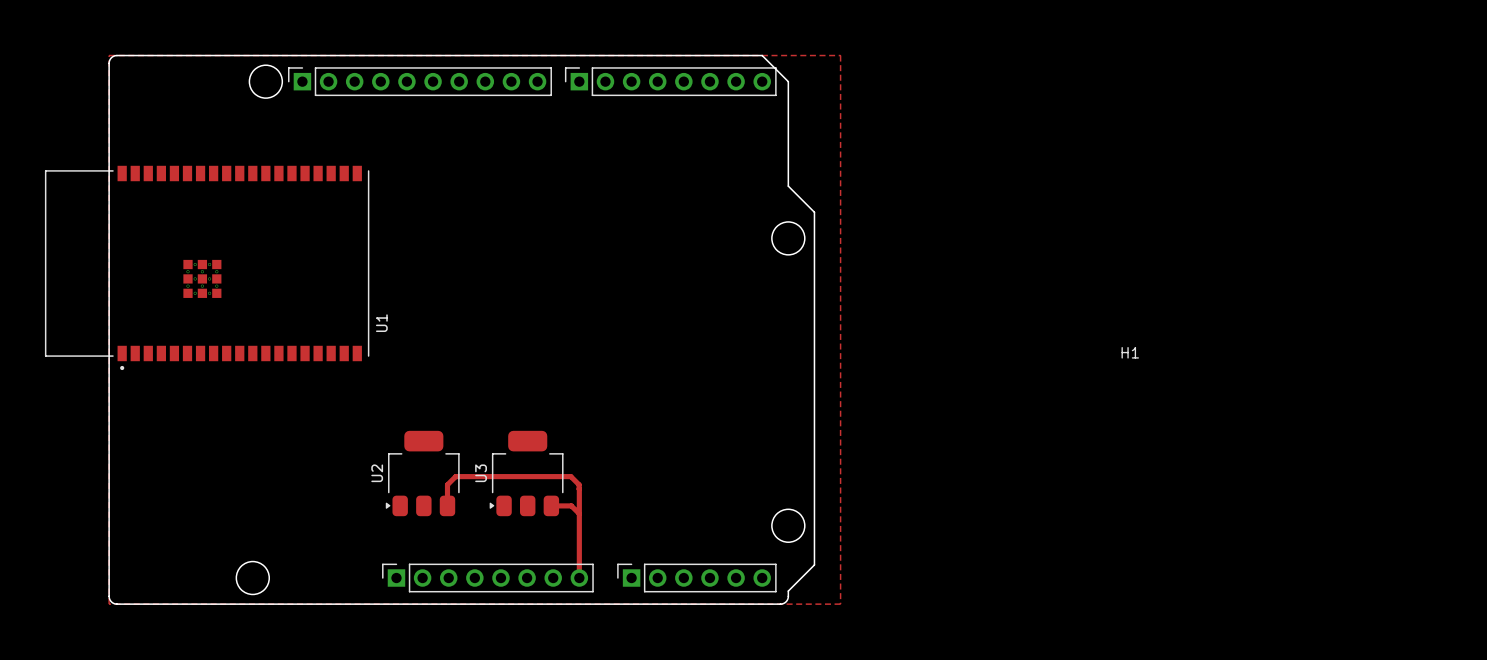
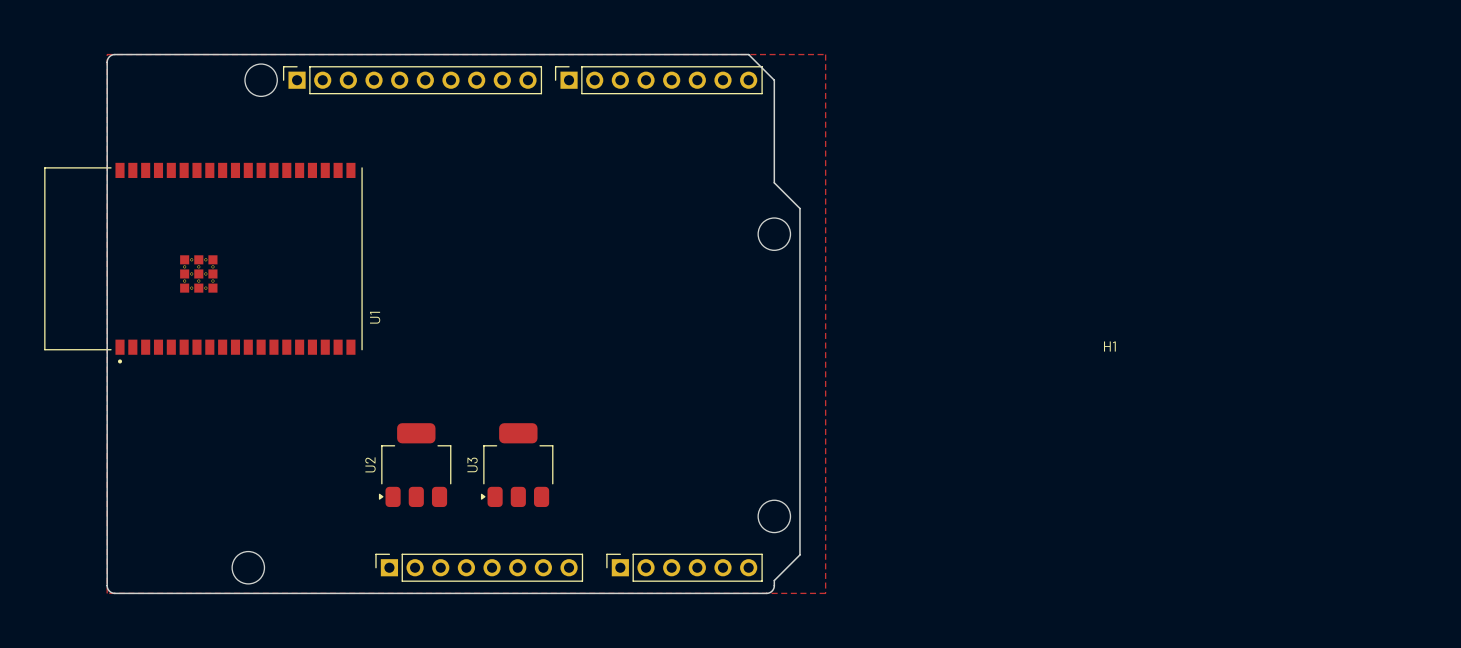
top track: (447, 505) (447, 484) (455, 476) (570, 476) (579, 484) (579, 578) -> none
top track: (551, 505) (571, 505) (579, 513) -> none

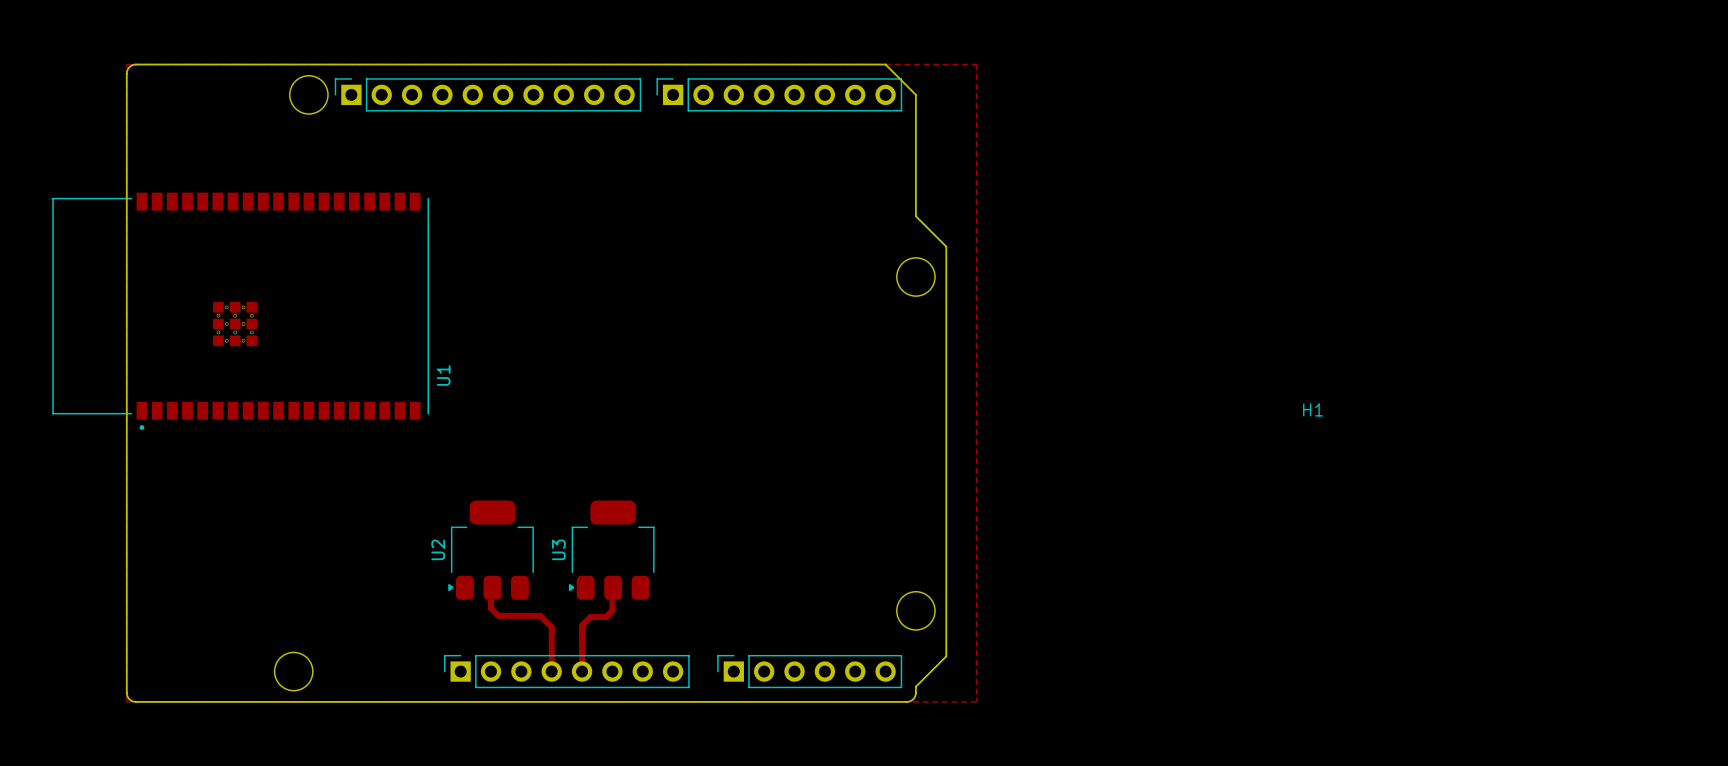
top track: none -> (490, 587) (490, 608) (498, 615) (540, 615) (551, 627) (551, 671)
top track: none -> (612, 587) (612, 610) (605, 617) (590, 617) (582, 625) (582, 671)

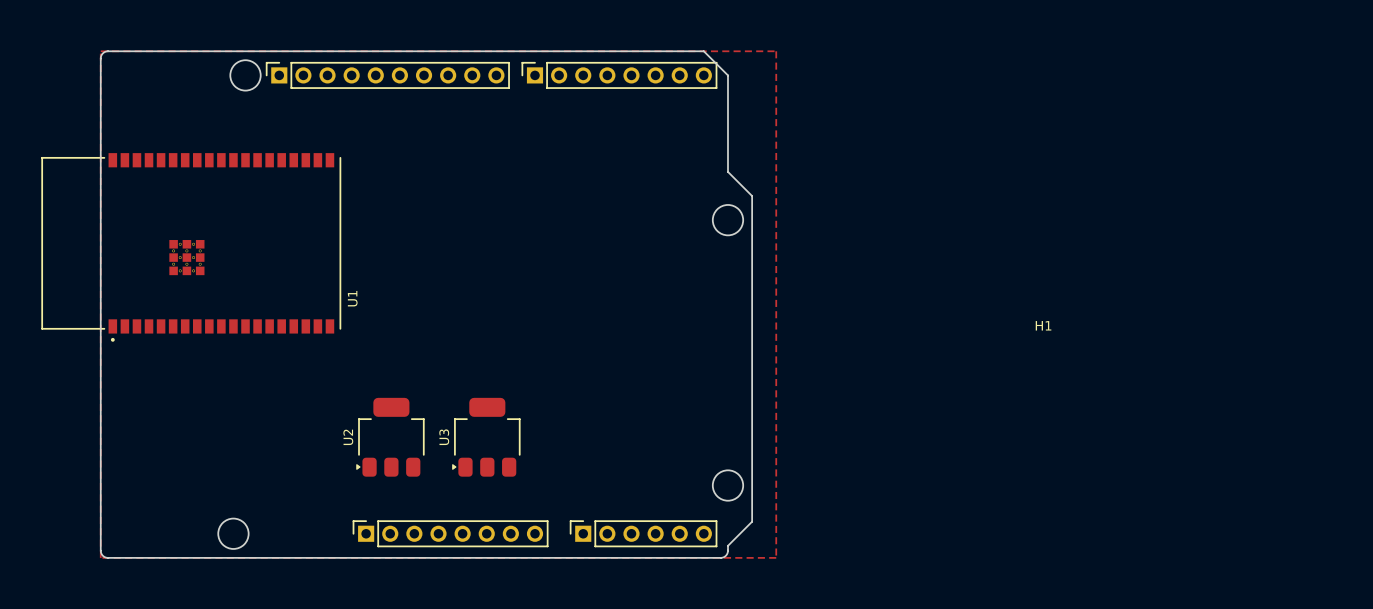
top track: (490, 587) (490, 608) (498, 615) (540, 615) (551, 627) (551, 671) -> none
top track: (612, 587) (612, 610) (605, 617) (590, 617) (582, 625) (582, 671) -> none

